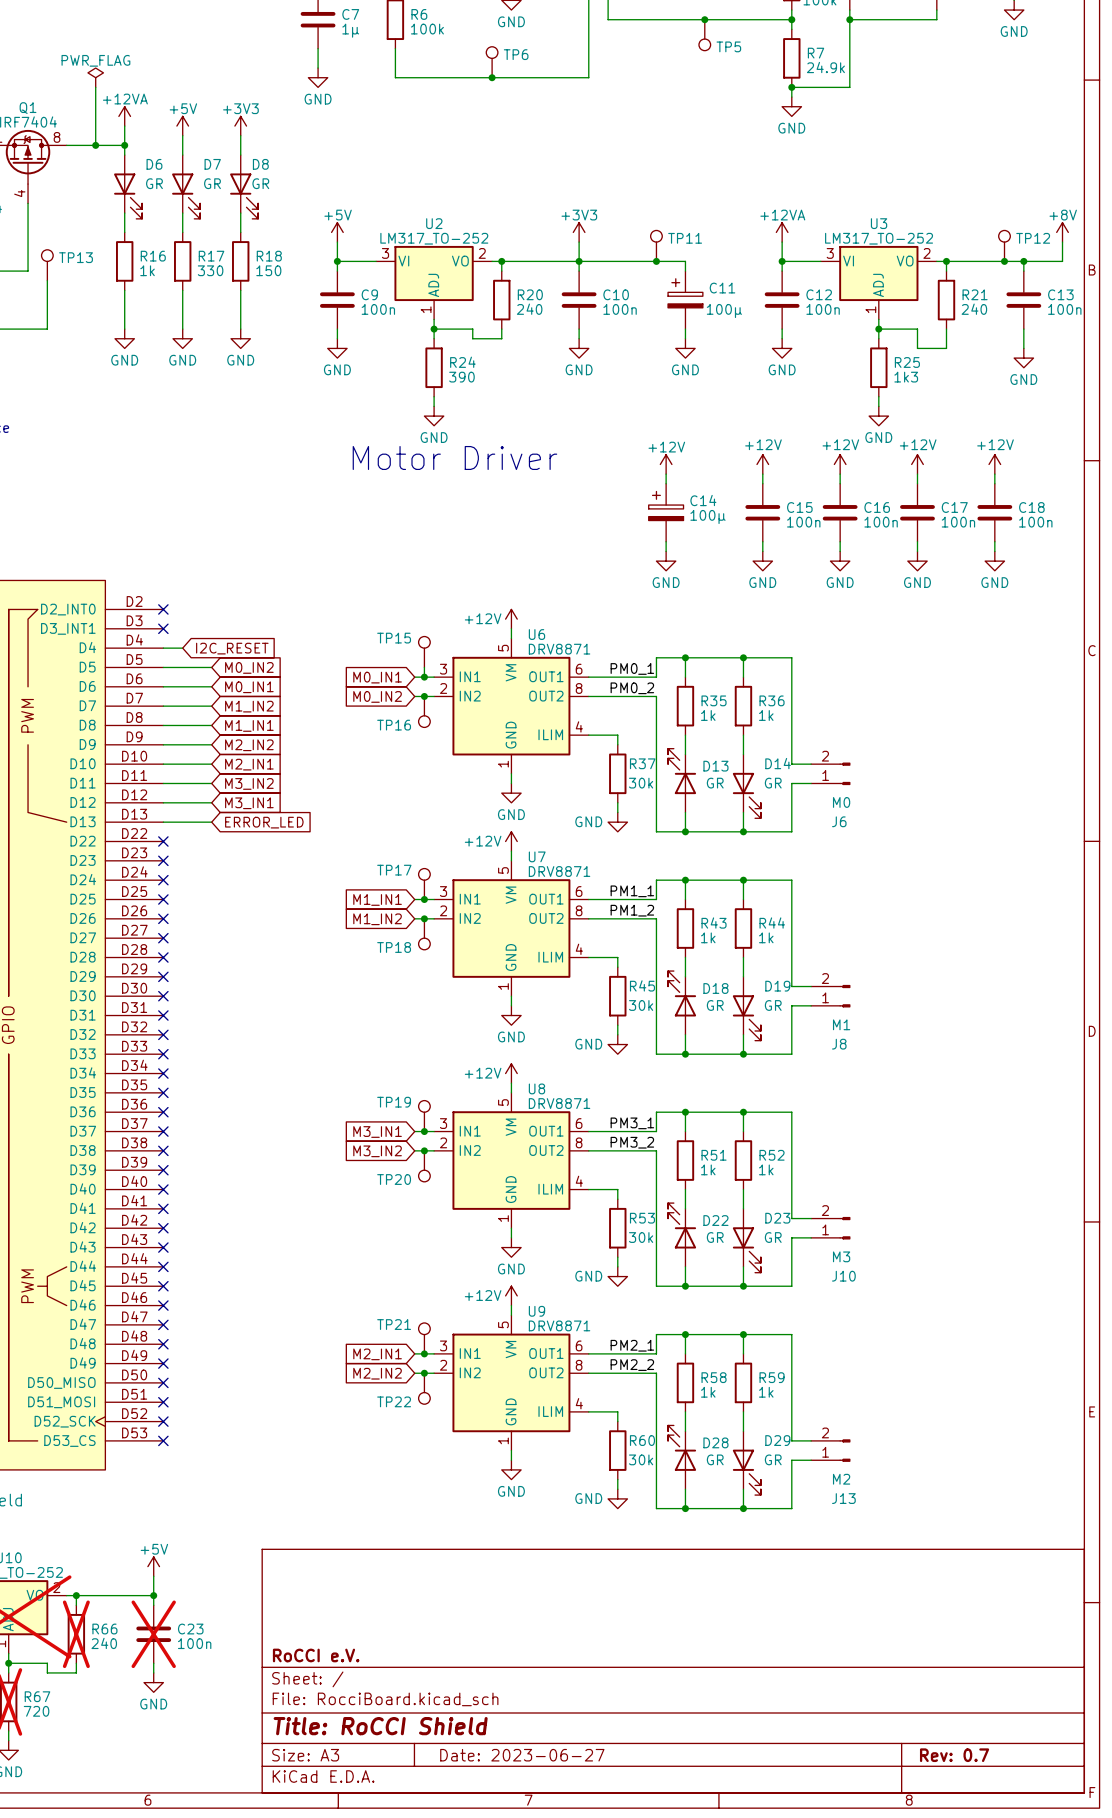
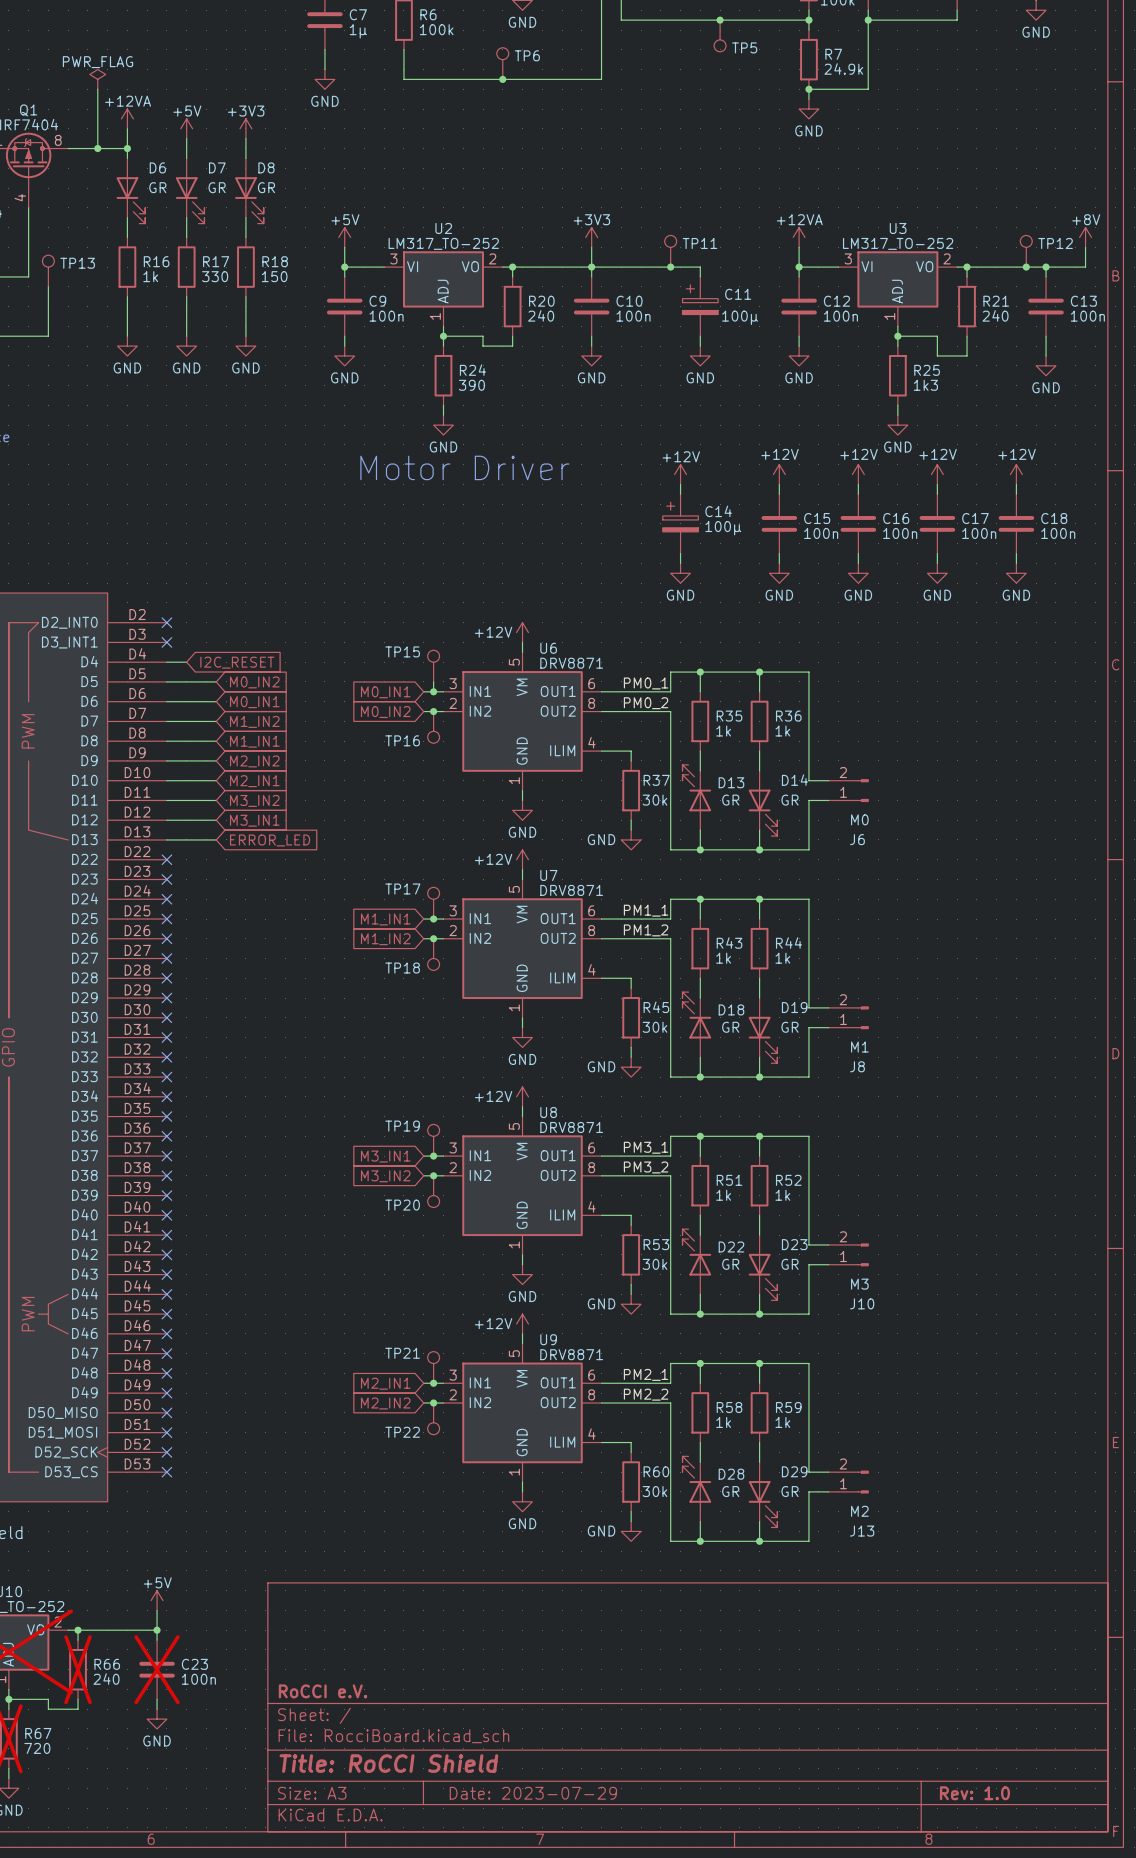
title block: Date: 2023-06-27 (522, 1755) -> Date: 2023-07-29 (533, 1793)
title block: Rev: 0.7 (954, 1755) -> Rev: 1.0 (974, 1793)

